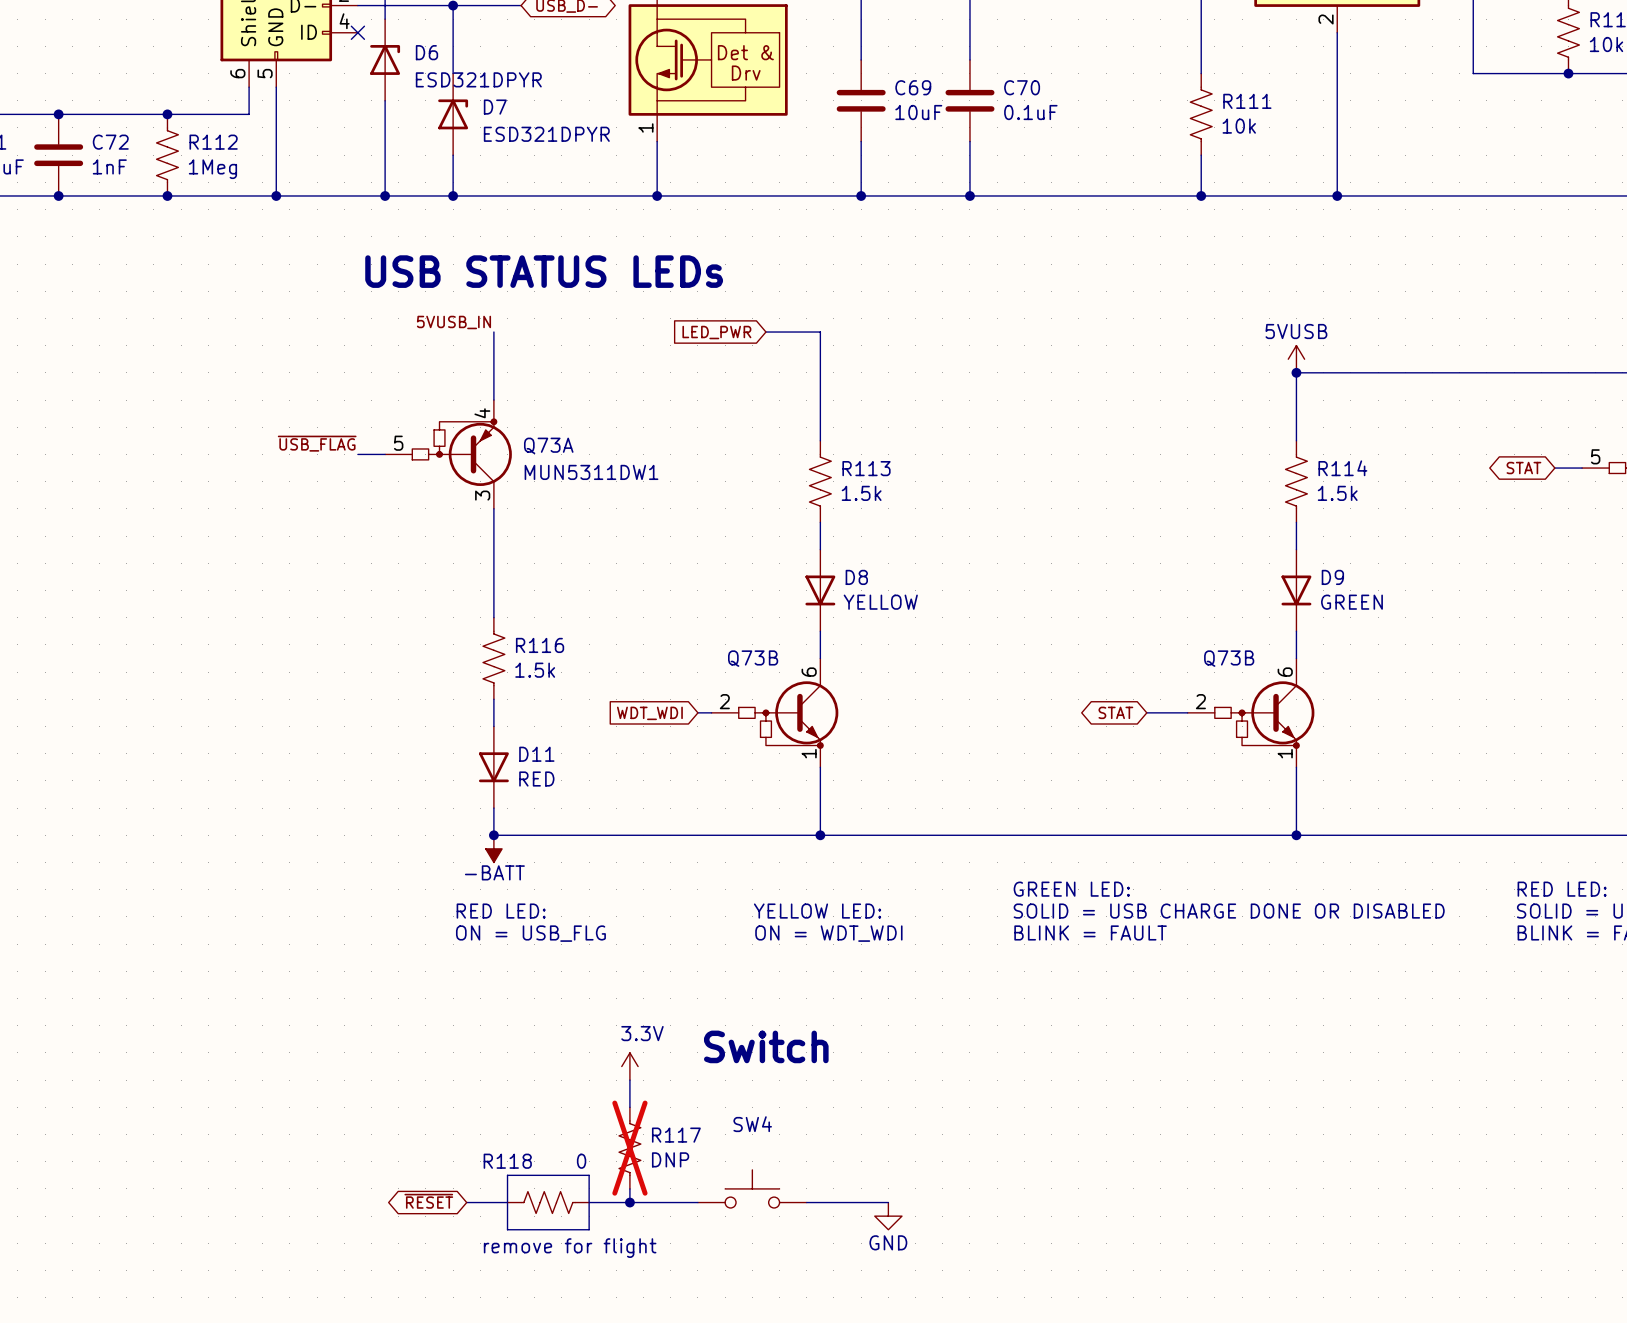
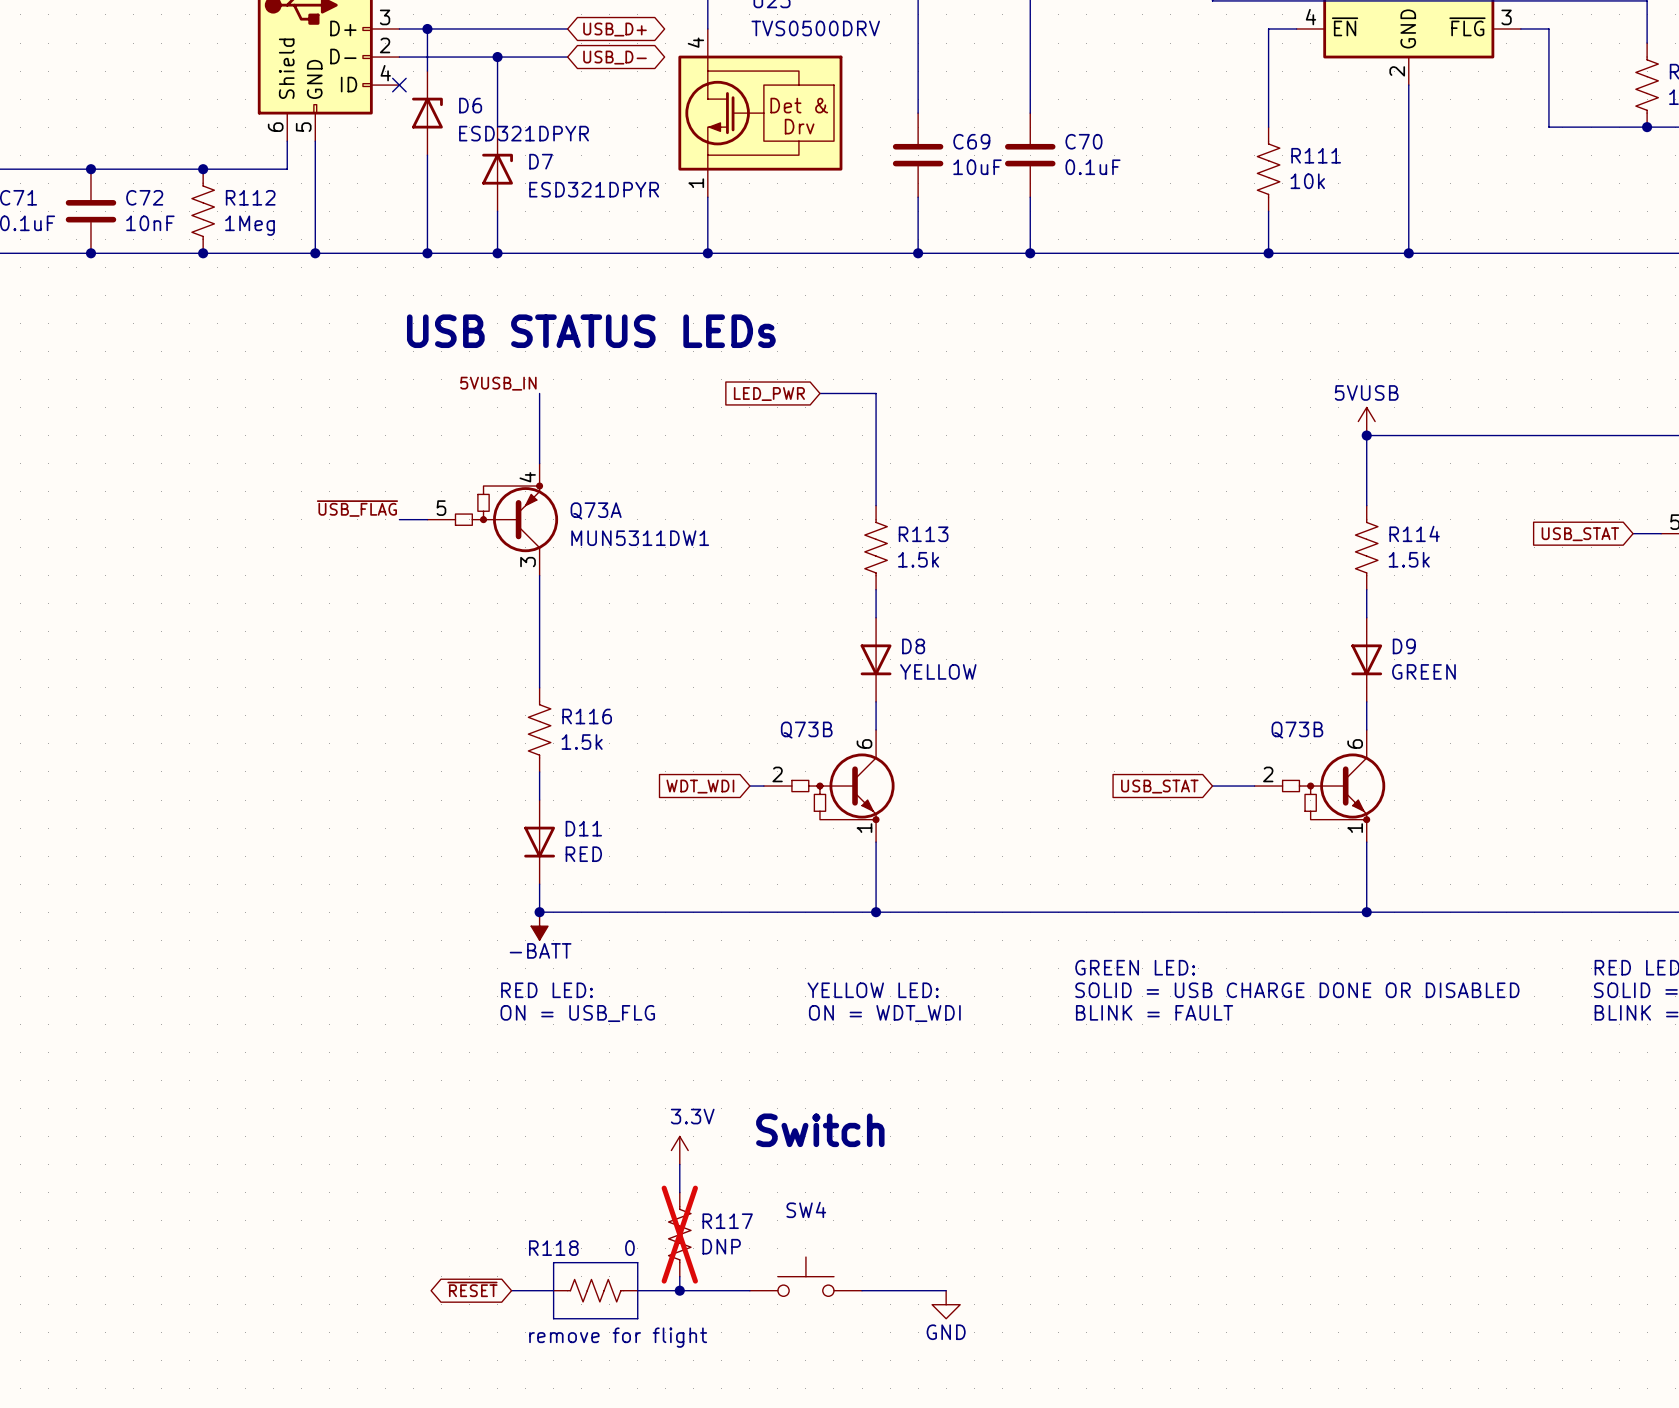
C72 value: 1nF (109, 166) -> 10nF (150, 223)
global label shape: bidirectional (1523, 468) -> input (1580, 534)
global label: STAT (1523, 468) -> USB_STAT (1580, 534)
global label shape: bidirectional (1115, 712) -> input (1159, 786)
global label: STAT (1115, 712) -> USB_STAT (1159, 786)

